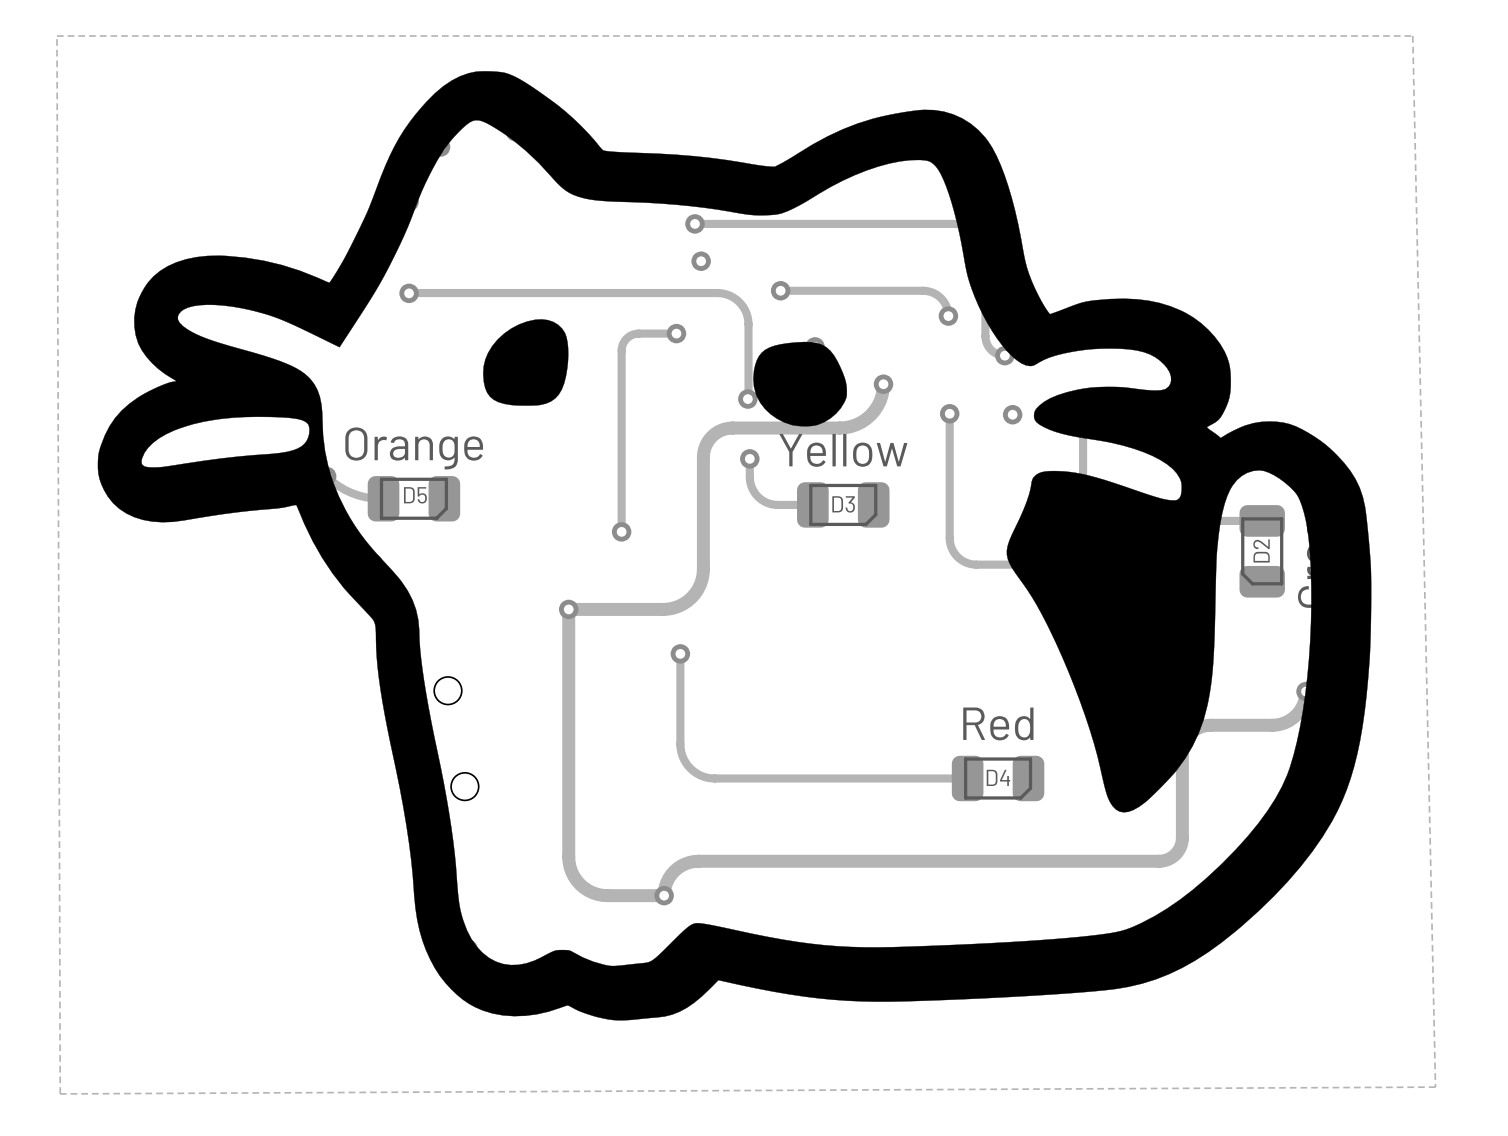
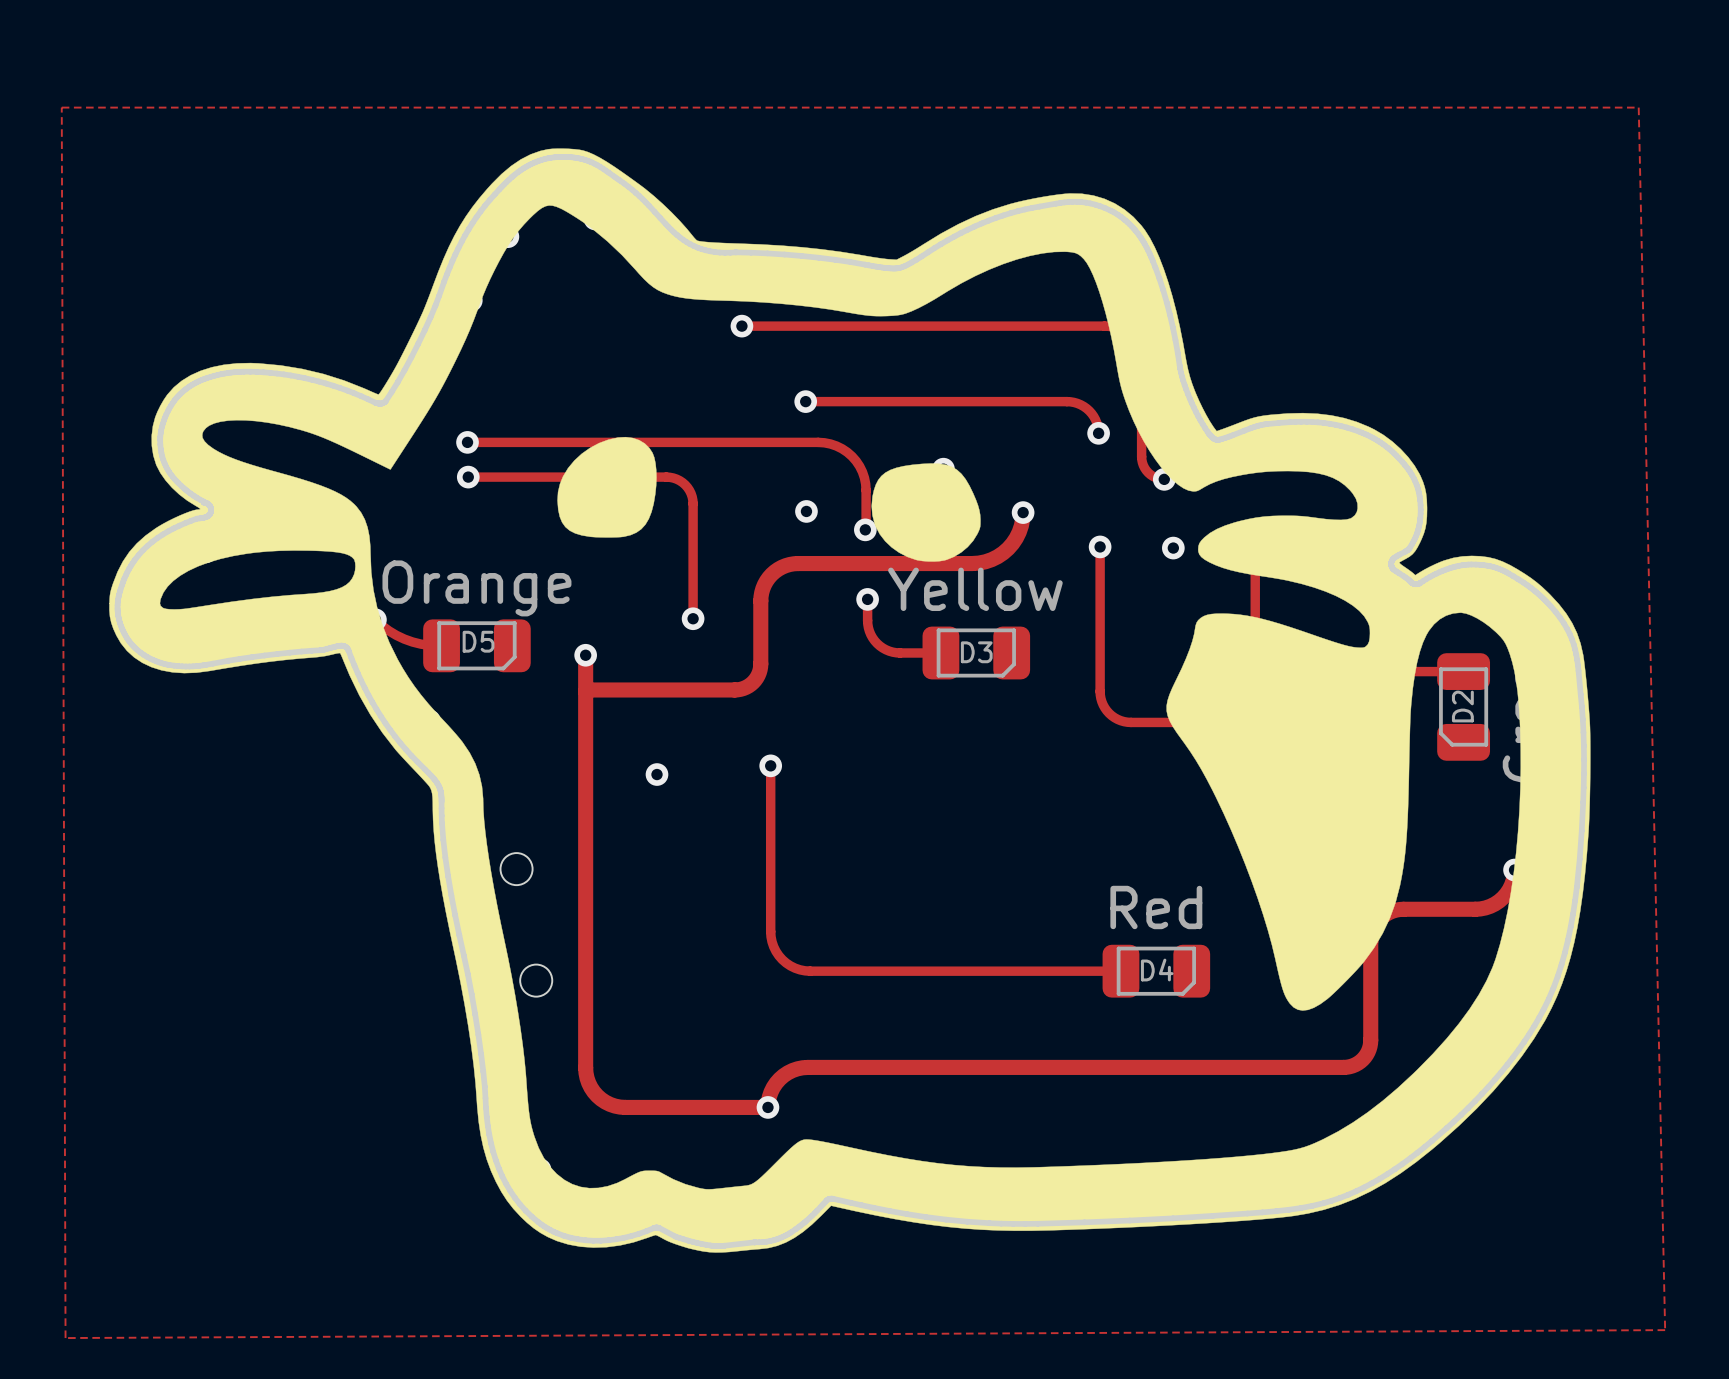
track: none -> (741, 326) (803, 326)
via: none -> (741, 326)
via: (694, 223) -> none
via: (701, 261) -> none
via: none -> (805, 401)
track: (780, 290) (926, 290) (935, 294) (943, 300) (948, 316) -> (805, 401) (1070, 401) (1080, 404) (1089, 410) (1095, 419) (1098, 433)
via: (780, 290) -> none
track: (409, 293) (724, 293) (736, 299) (746, 313) (748, 365) -> (467, 442) (824, 442) (842, 448) (856, 461) (864, 477) (866, 490)
via: (409, 293) -> none
via: none -> (467, 442)
track: (676, 333) (635, 334) (626, 338) (622, 346) (621, 531) -> none
via: (676, 333) -> none
track: none -> (468, 477) (666, 477) (679, 480) (687, 487) (692, 500) (693, 618)
via: none -> (468, 477)
via: none -> (806, 511)
track: (732, 428) (714, 434) (704, 449) (703, 574) (698, 589) (691, 597) (683, 604) (668, 609) (568, 609) (569, 862) (573, 876) (583, 887) (592, 892) (607, 895) -> (585, 655) (587, 1078) (597, 1095) (615, 1106) (701, 1107)
track: none -> (847, 563) (789, 564) (778, 569) (768, 577) (761, 596) (760, 669) (755, 680) (746, 687) (734, 689) (587, 689) (585, 691)
via: none -> (693, 618)
via: none -> (585, 655)
via: (621, 531) -> none
via: none -> (770, 765)
track: (680, 653) (681, 751) (685, 762) (693, 771) (703, 776) (714, 778) -> (770, 765) (772, 941) (778, 955) (790, 965) (805, 970) (826, 971)
via: (680, 653) -> none

